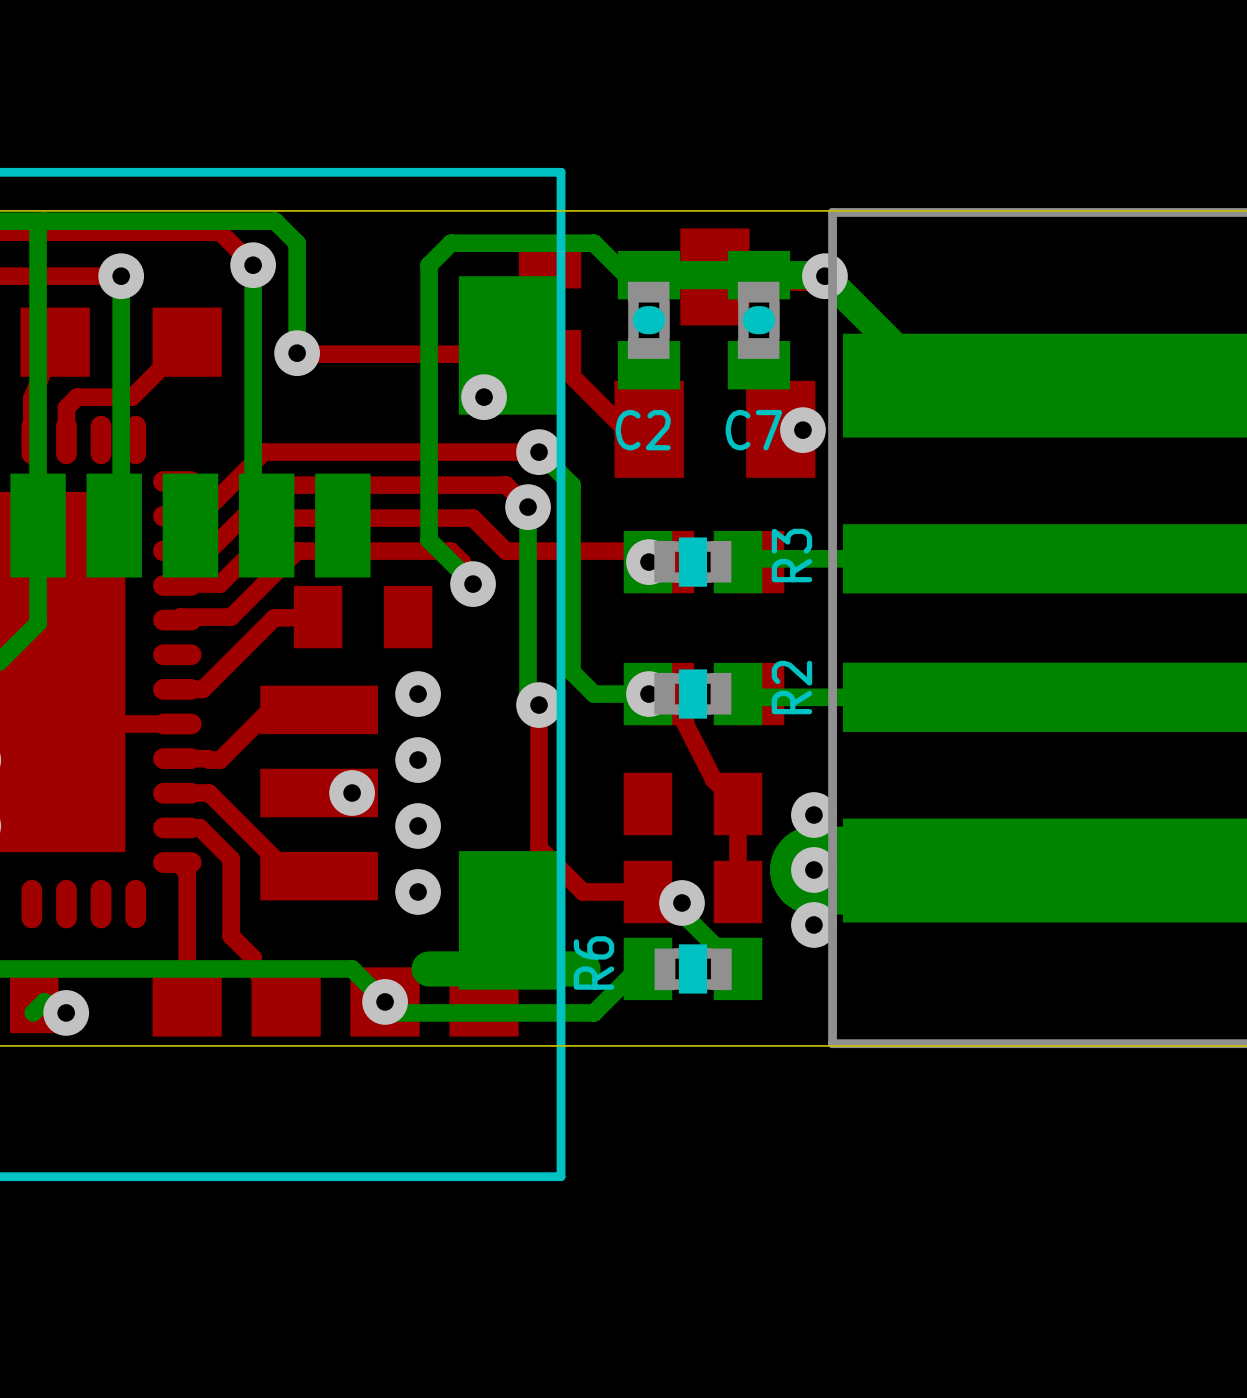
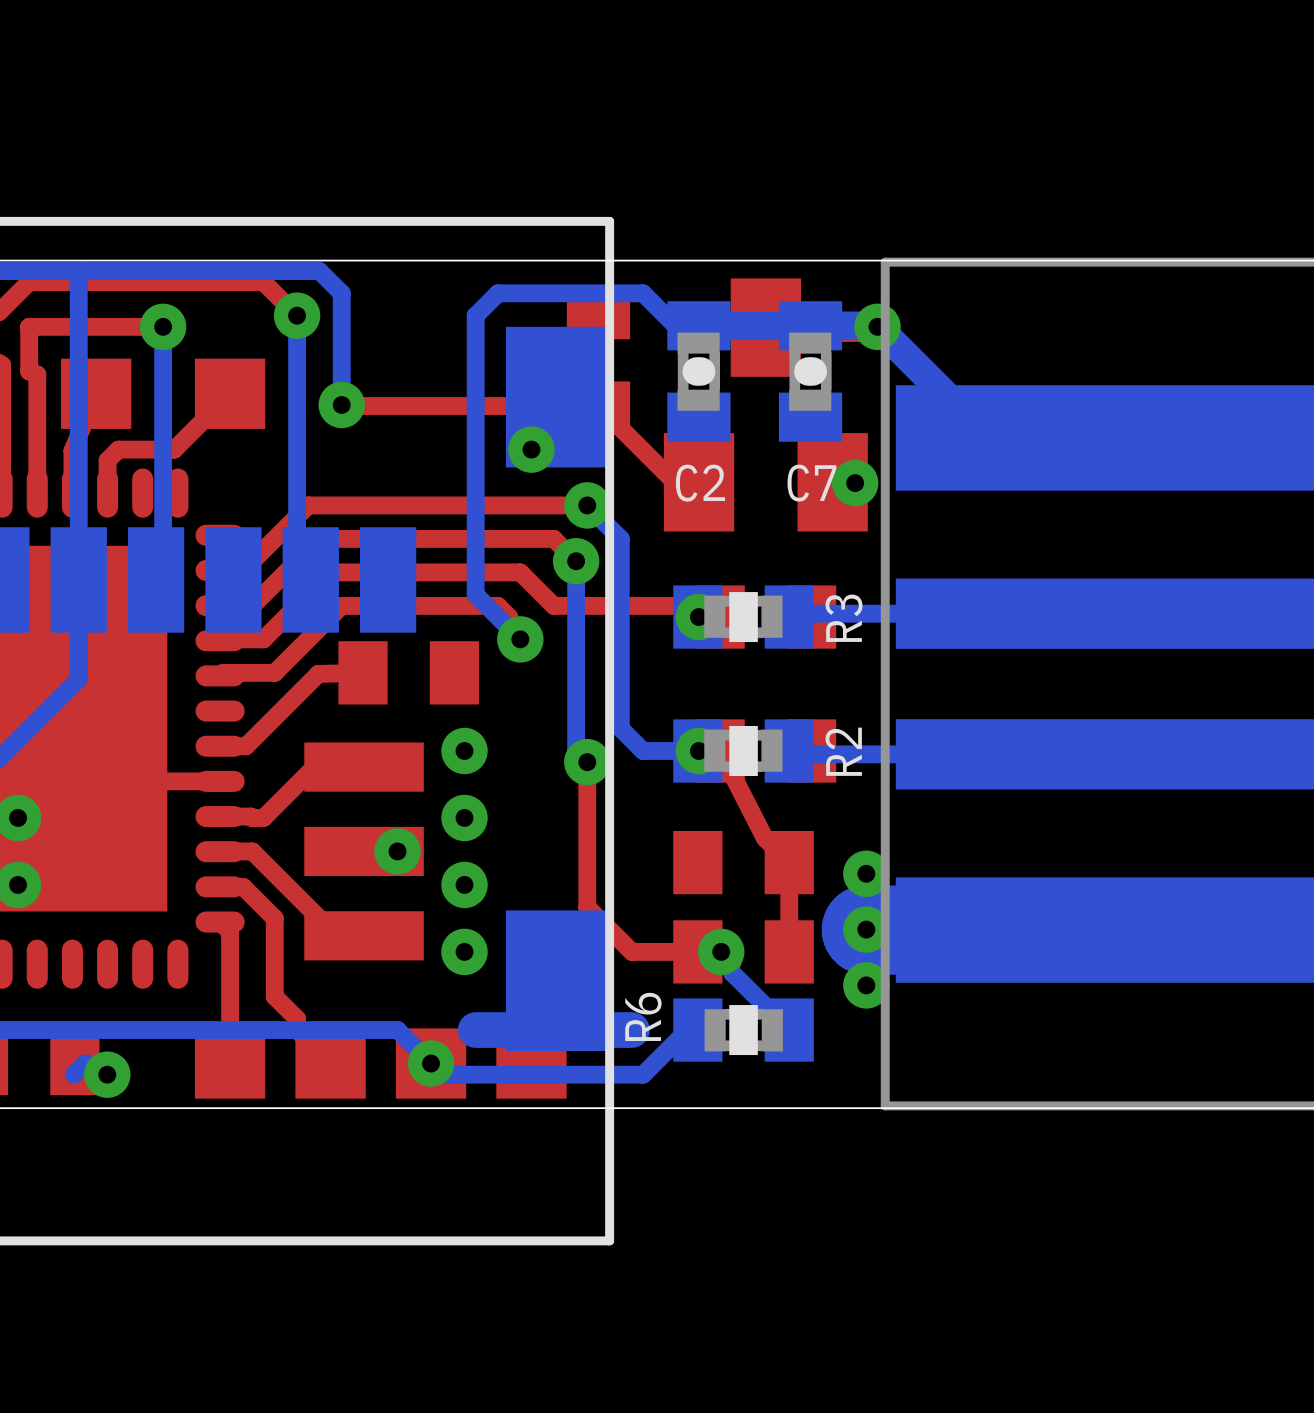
via position: (681, 902) -> (721, 951)

